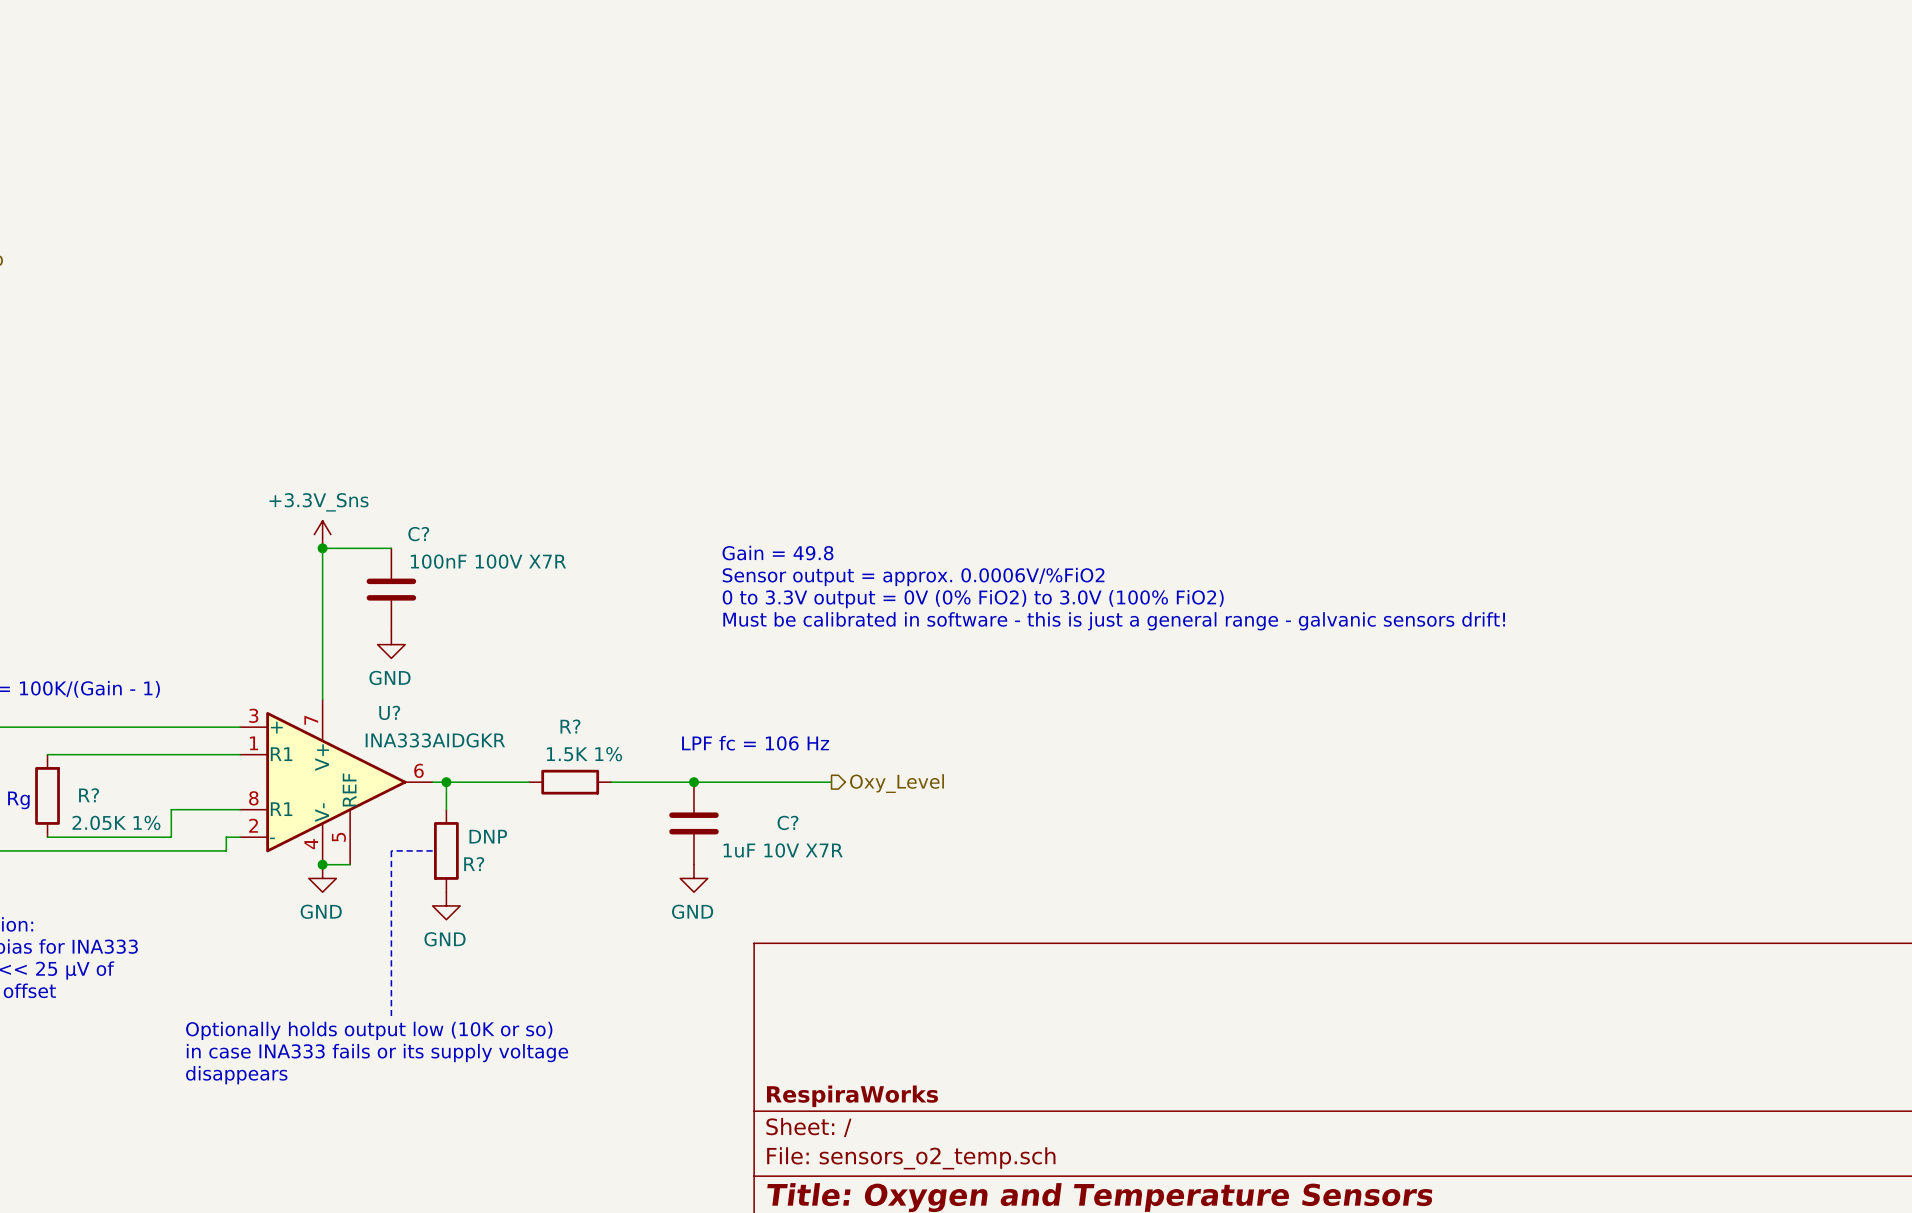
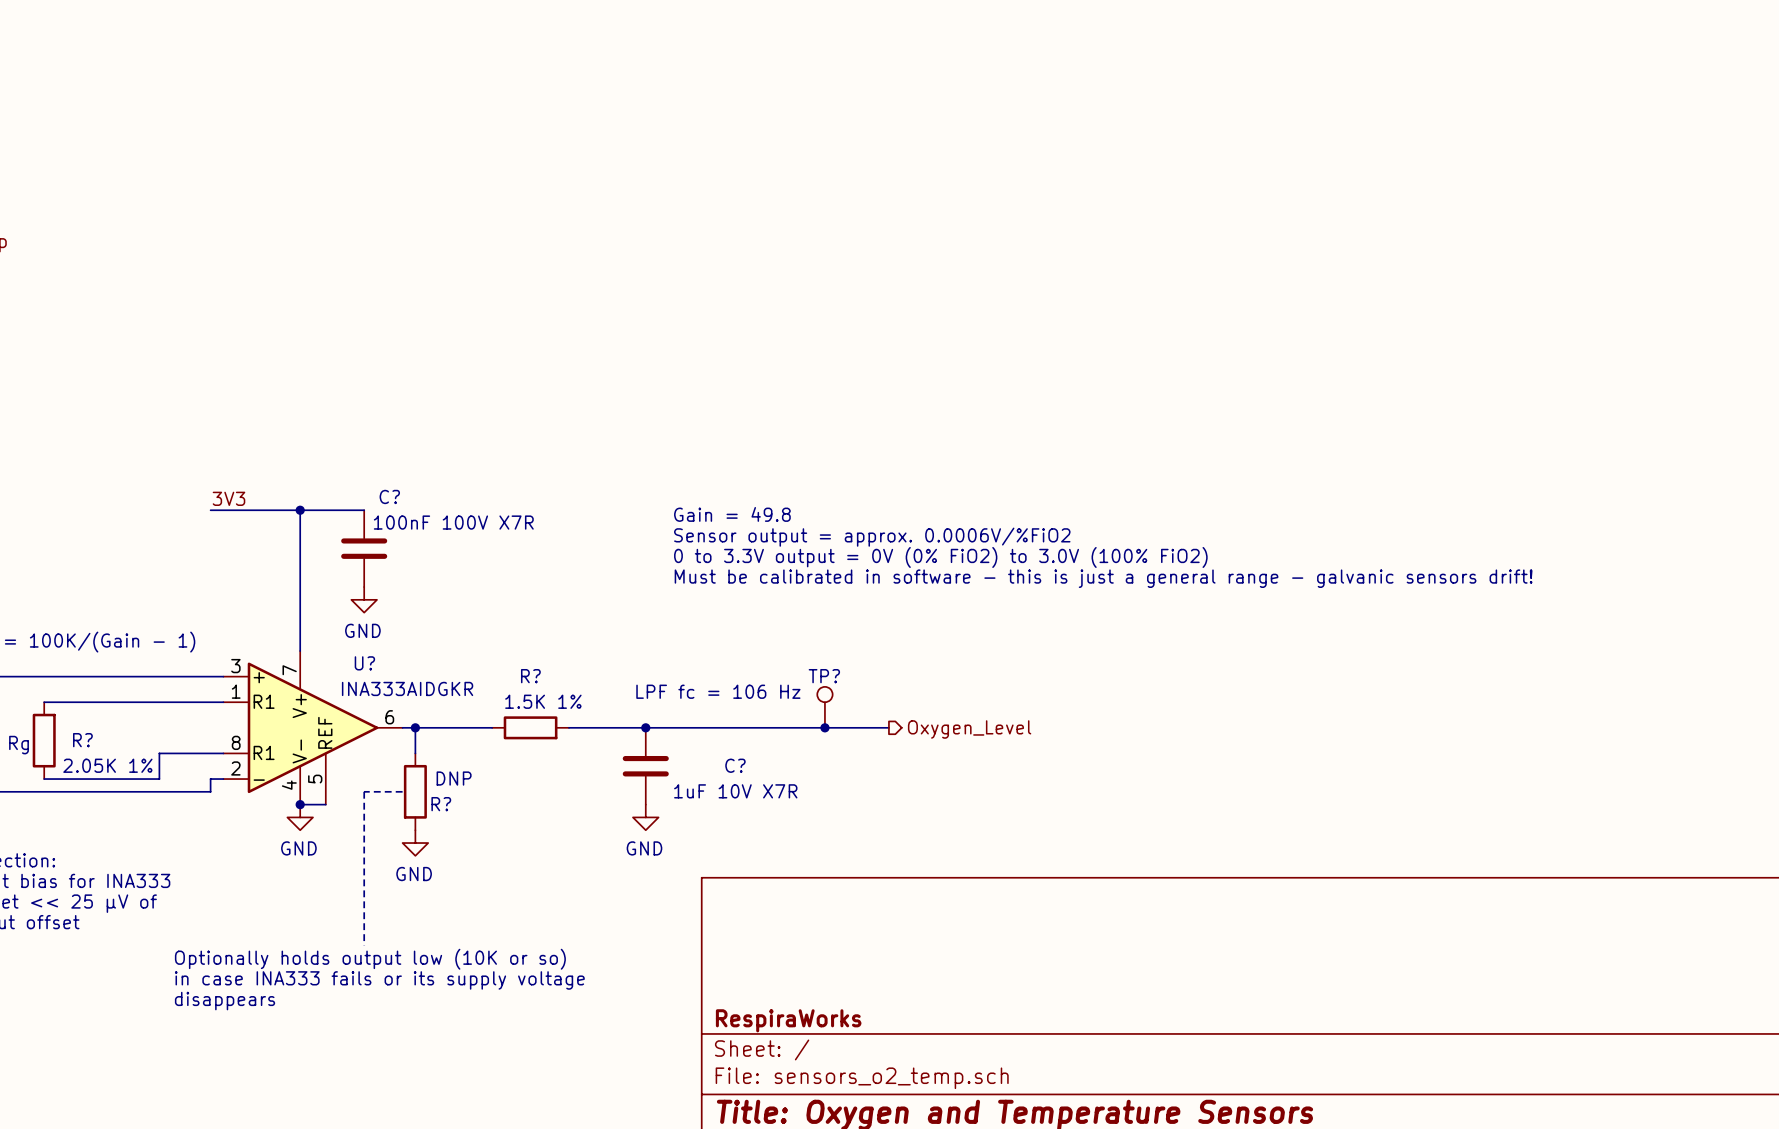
power symbol: +3.3V_Sns (322, 534) -> none
label: none -> 3V3 (228, 498)
wire: none -> (210, 510) (300, 510)
TP?: none -> (824, 707)
wire: none -> (773, 727) (888, 727)
junction: none -> (824, 727)
hierarchical label: Oxy_Level (897, 783) -> none
hierarchical label: none -> Oxygen_Level (969, 729)

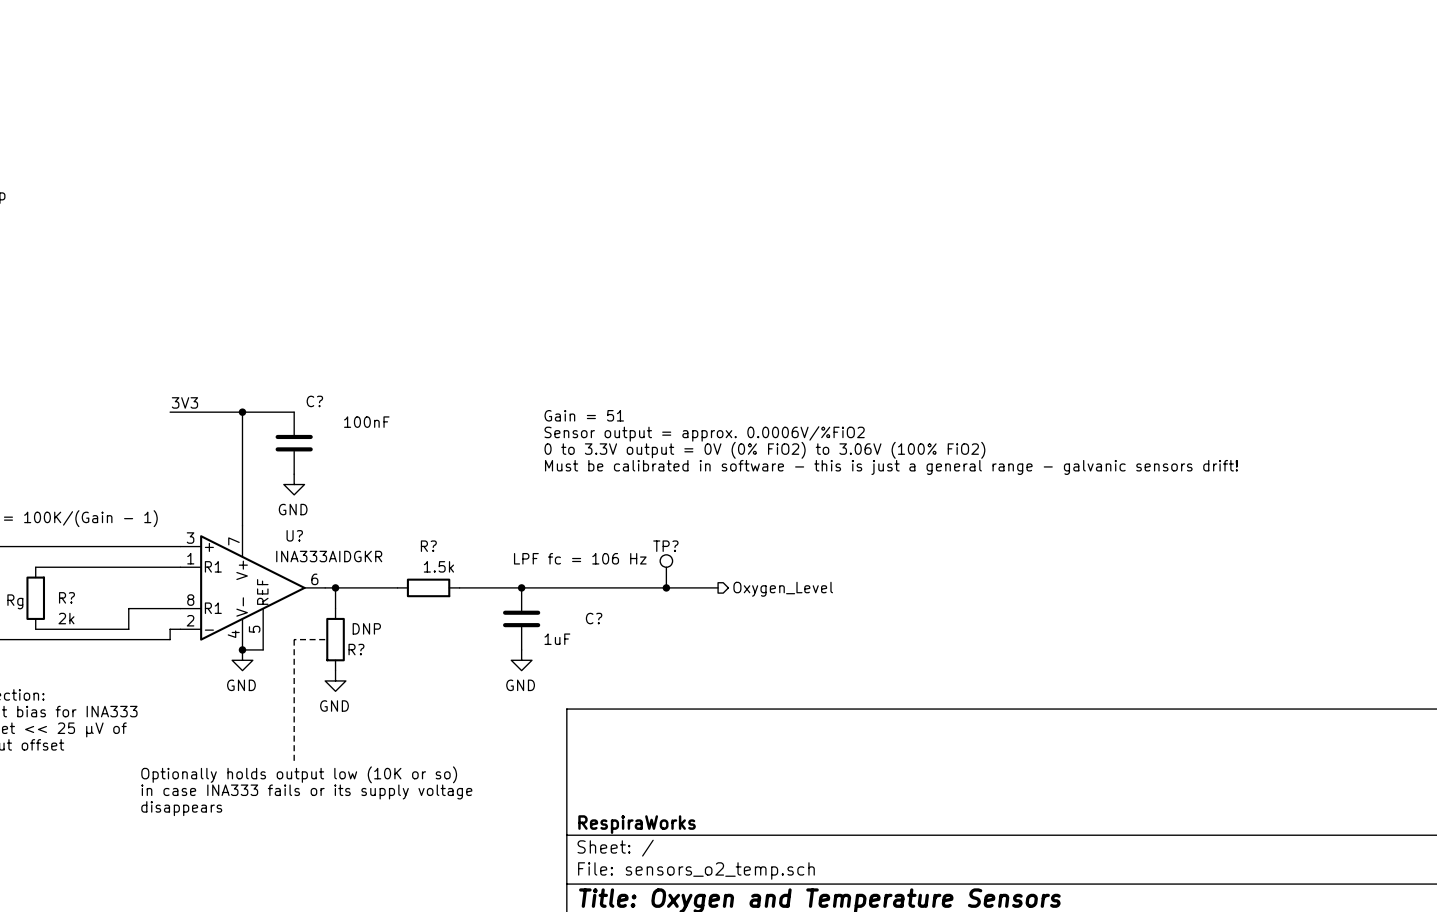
text: Gain = 49.8 (732, 514) -> Gain = 51 (584, 415)
C? value: 100nF 100V X7R (453, 522) -> 100nF (366, 422)
text: 0 to 3.3V output = 0V (0% FiO2) to 3.0V (100% FiO2) (940, 557) -> 0 to 3.3V output = 0V (0% FiO2) to 3.06V (100% FiO2) (764, 450)
R? value: 1.5K 1% (543, 701) -> 1.5k (438, 566)
R? value: 2.05K 1% (107, 765) -> 2k (66, 618)
C? value: 1uF 10V X7R (735, 791) -> 1uF (557, 639)

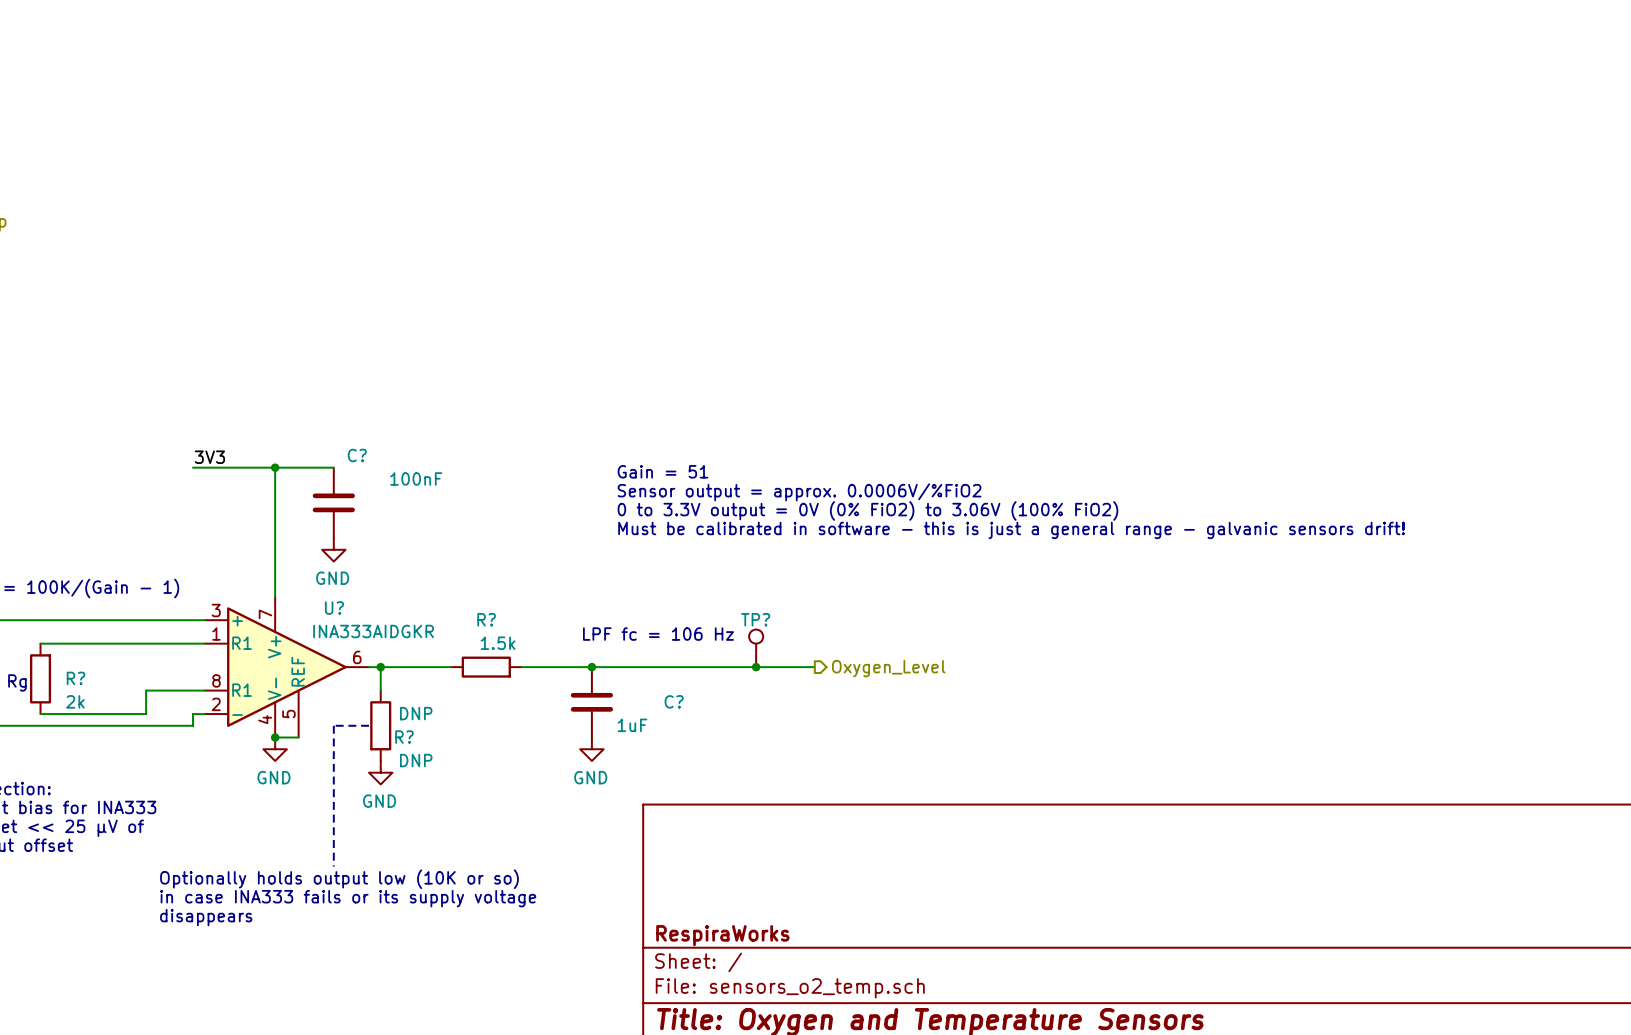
R? text: none -> DNP (416, 760)

